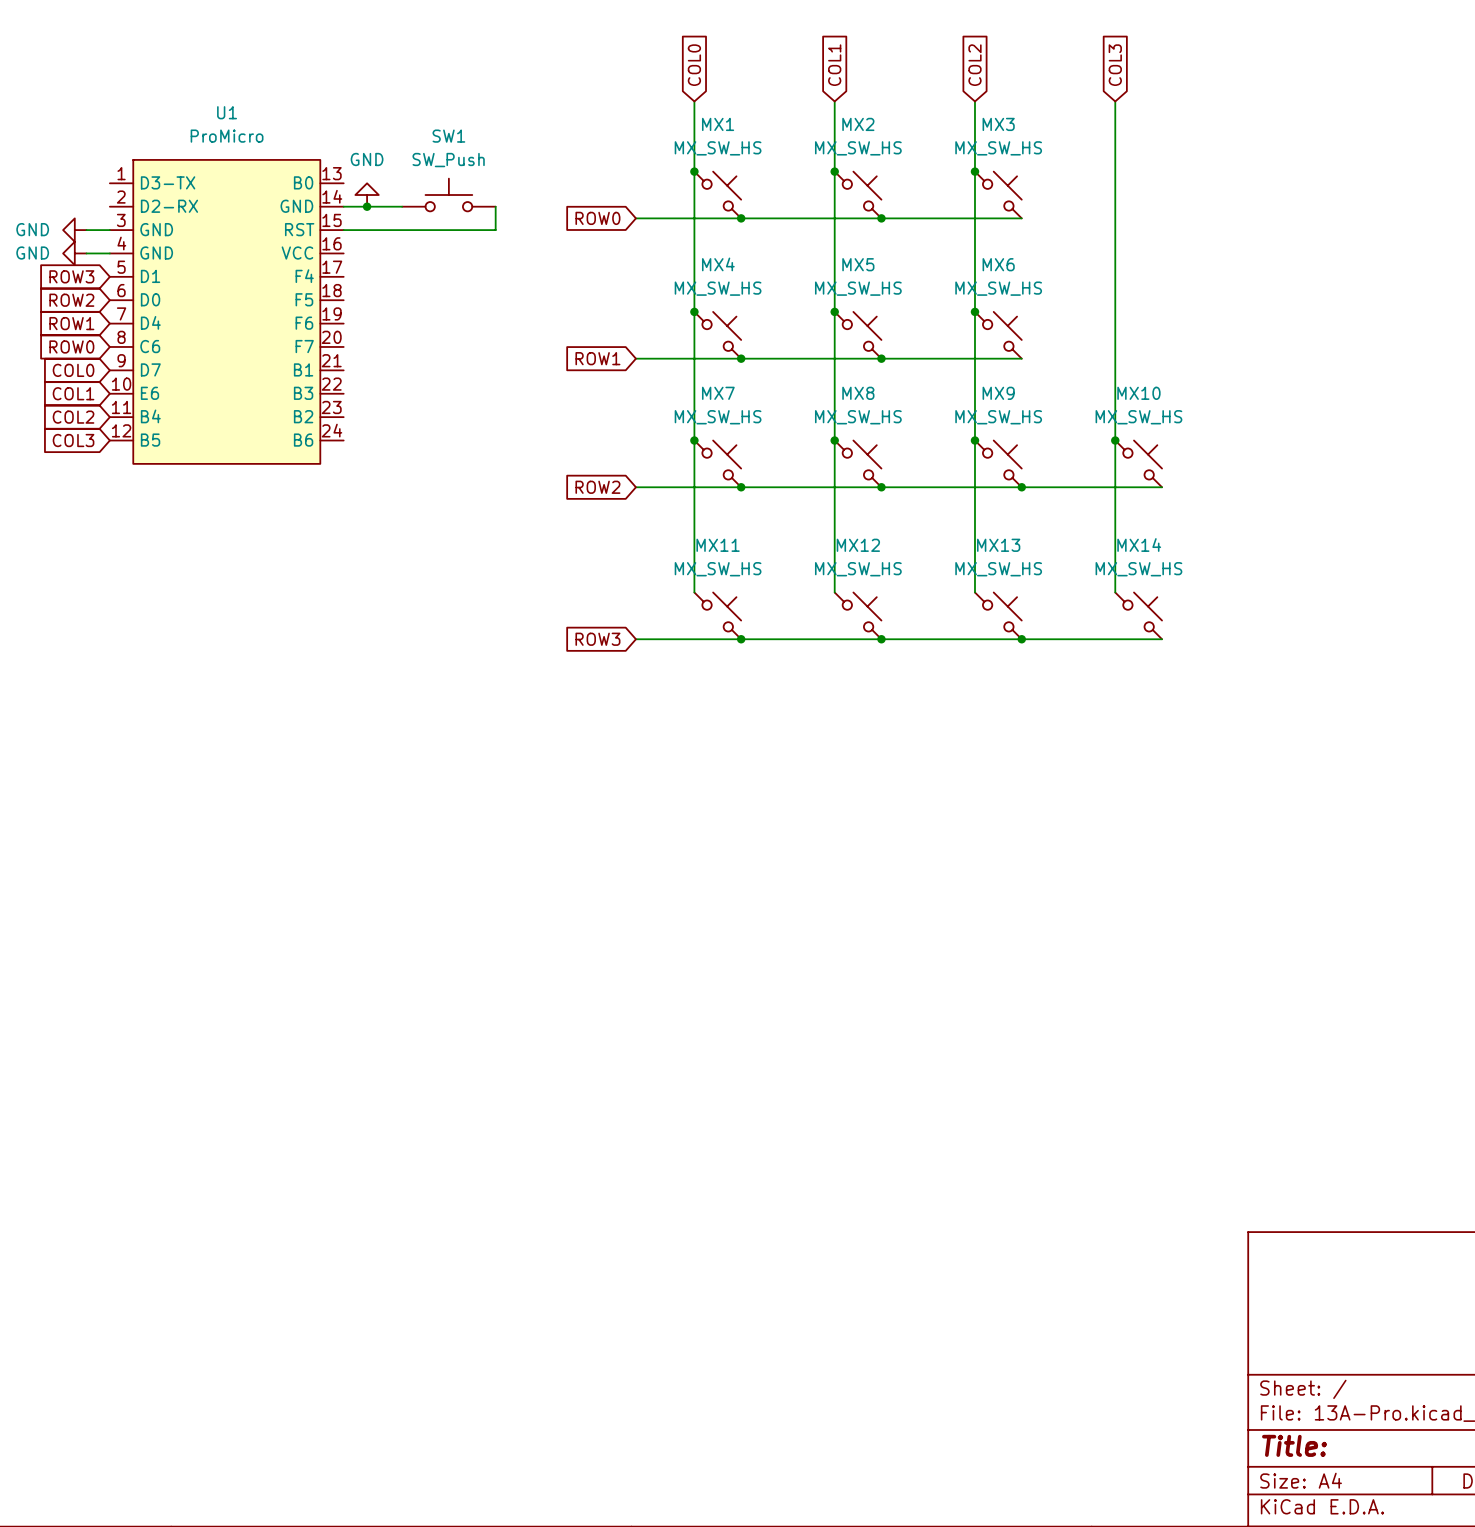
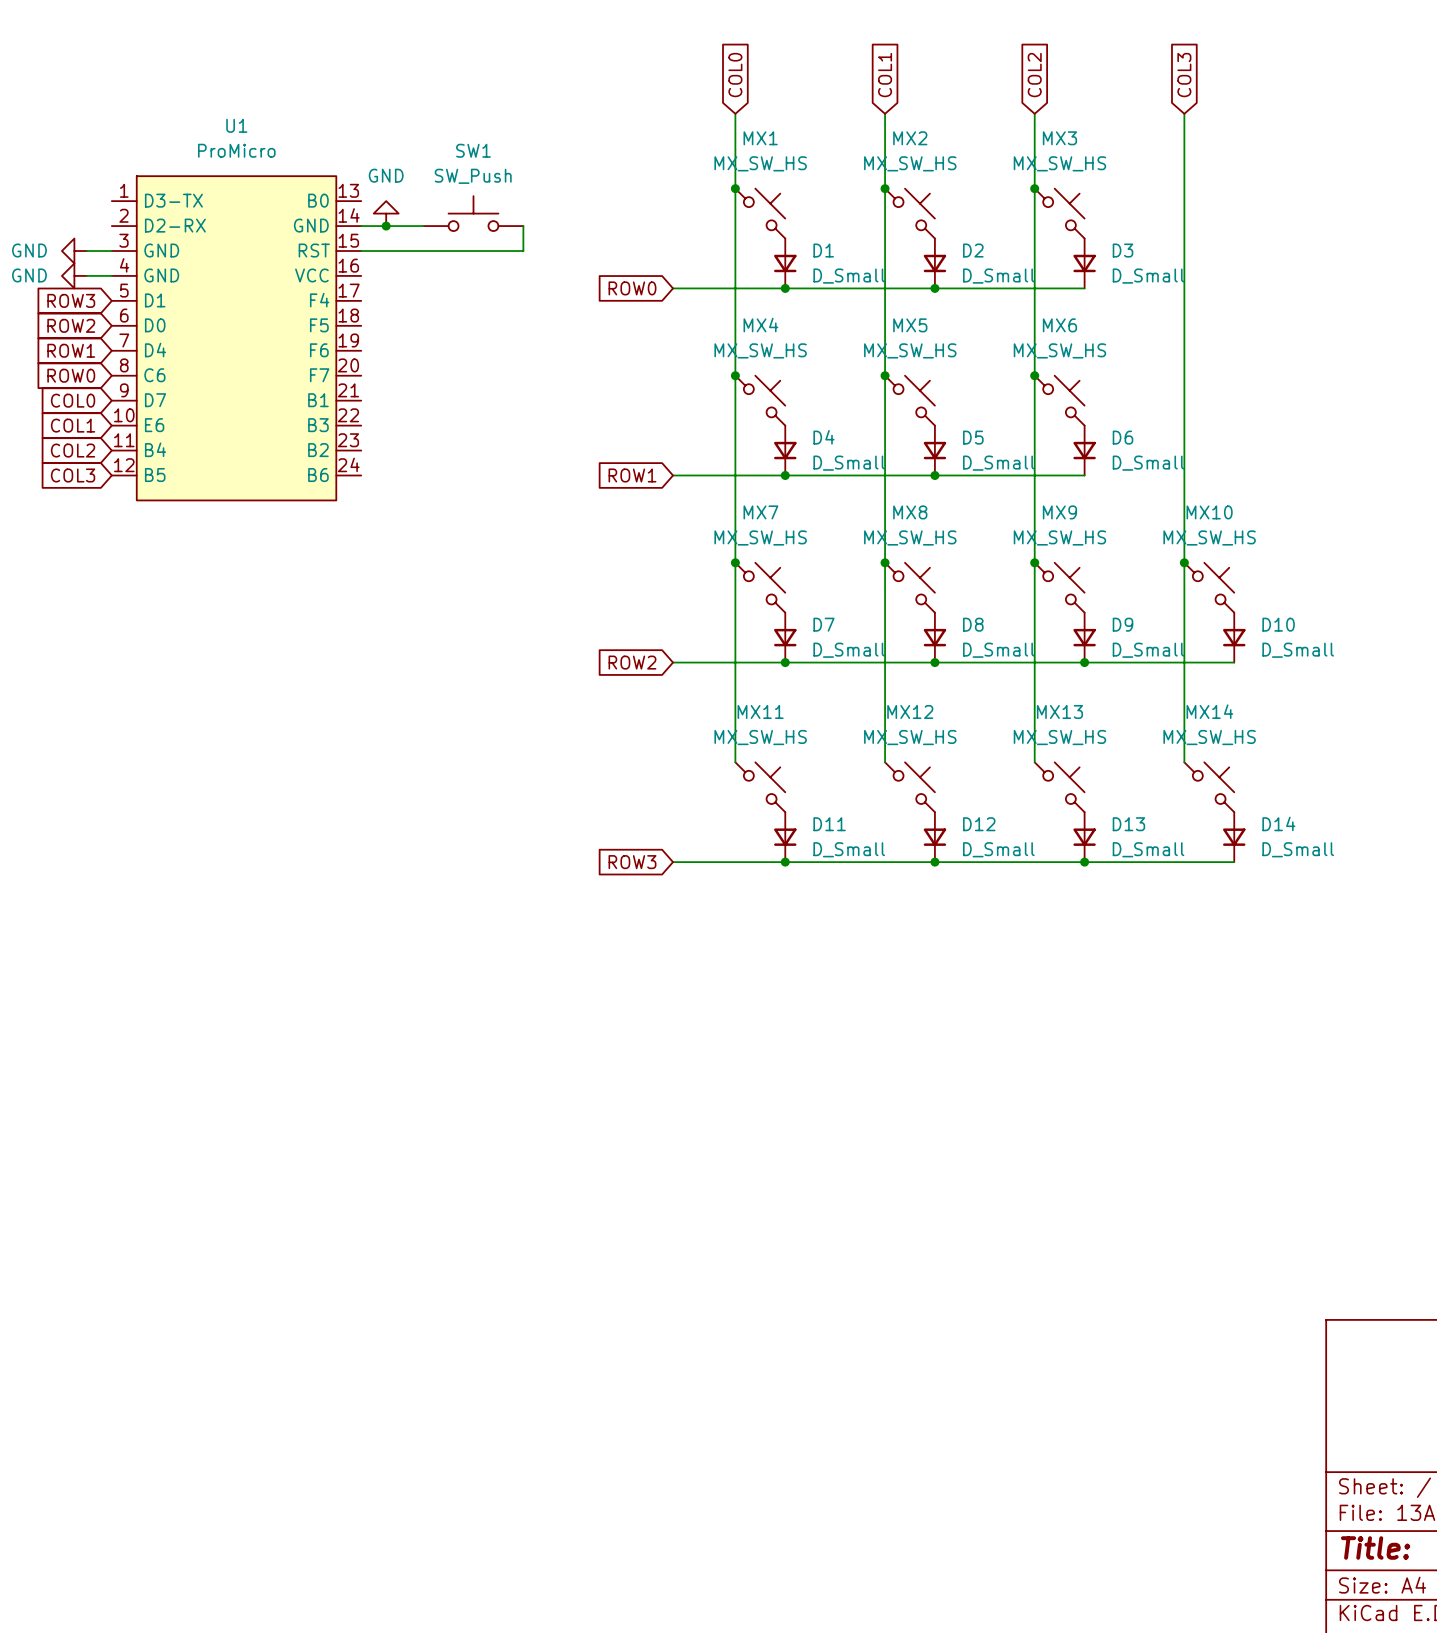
global label position: ROW0 (597, 218) -> ROW0 (632, 288)
wire: (635, 218) (1021, 218) -> (673, 288) (1084, 288)
junction: (741, 218) -> none
junction: (881, 218) -> none
D1: none -> D_Small (785, 263)
D2: none -> D_Small (934, 263)
D3: none -> D_Small (1084, 263)
junction: none -> (785, 288)
junction: none -> (934, 288)
junction: (694, 311) -> none
junction: (834, 311) -> none
junction position: (974, 311) -> (1034, 375)
MX4 position: (717, 335) -> (760, 400)
MX5 position: (858, 335) -> (909, 400)
MX6 position: (998, 335) -> (1059, 400)
junction: none -> (735, 375)
junction: none -> (885, 375)
global label position: ROW1 (597, 358) -> ROW1 (632, 475)
wire: (635, 358) (1021, 358) -> (673, 475) (1084, 475)
junction: (741, 358) -> none
junction: (881, 358) -> none
D4: none -> D_Small (785, 450)
D5: none -> D_Small (934, 450)
D6: none -> D_Small (1084, 450)
junction: (694, 440) -> none
junction: none -> (785, 475)
junction: (834, 440) -> none
junction: none -> (934, 475)
junction: (974, 440) -> none
junction: (1115, 440) -> none
MX7 position: (717, 463) -> (760, 587)
MX8 position: (858, 463) -> (909, 587)
MX9 position: (998, 463) -> (1059, 587)
MX10 position: (1138, 463) -> (1209, 587)
global label position: ROW2 (597, 487) -> ROW2 (632, 662)
wire: (635, 487) (1162, 487) -> none
junction: (741, 487) -> none
junction: (881, 487) -> none
junction: (1021, 487) -> none
junction: none -> (735, 562)
junction: none -> (885, 562)
junction: none -> (1034, 562)
junction: none -> (1184, 562)
wire: none -> (735, 637) (735, 762)
D7: none -> D_Small (785, 637)
wire: none -> (885, 637) (885, 762)
D8: none -> D_Small (934, 637)
wire: none -> (1034, 637) (1034, 762)
D9: none -> D_Small (1084, 637)
wire: none -> (1184, 637) (1184, 762)
D10: none -> D_Small (1234, 637)
MX11 position: (717, 615) -> (760, 787)
MX12 position: (858, 615) -> (909, 787)
MX13 position: (998, 615) -> (1059, 787)
MX14 position: (1138, 615) -> (1209, 787)
global label position: ROW3 (597, 639) -> ROW3 (632, 862)
wire: (635, 639) (1162, 639) -> (673, 662) (1234, 662)
junction position: (741, 639) -> (785, 662)
junction position: (881, 639) -> (934, 662)
junction position: (1021, 639) -> (1084, 662)
D11: none -> D_Small (785, 837)
D12: none -> D_Small (934, 837)
D13: none -> D_Small (1084, 837)
D14: none -> D_Small (1234, 837)
wire: none -> (673, 862) (1234, 862)
junction: none -> (785, 862)
junction: none -> (934, 862)
junction: none -> (1084, 862)

